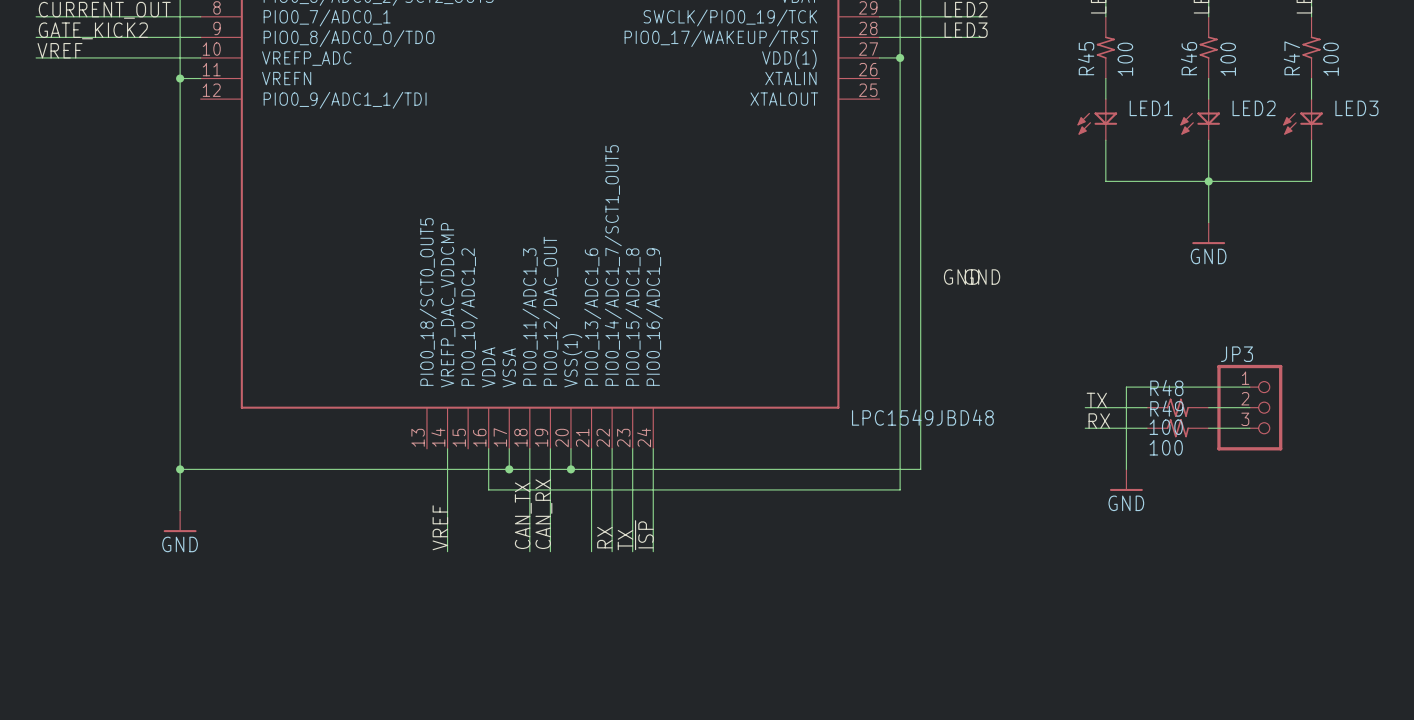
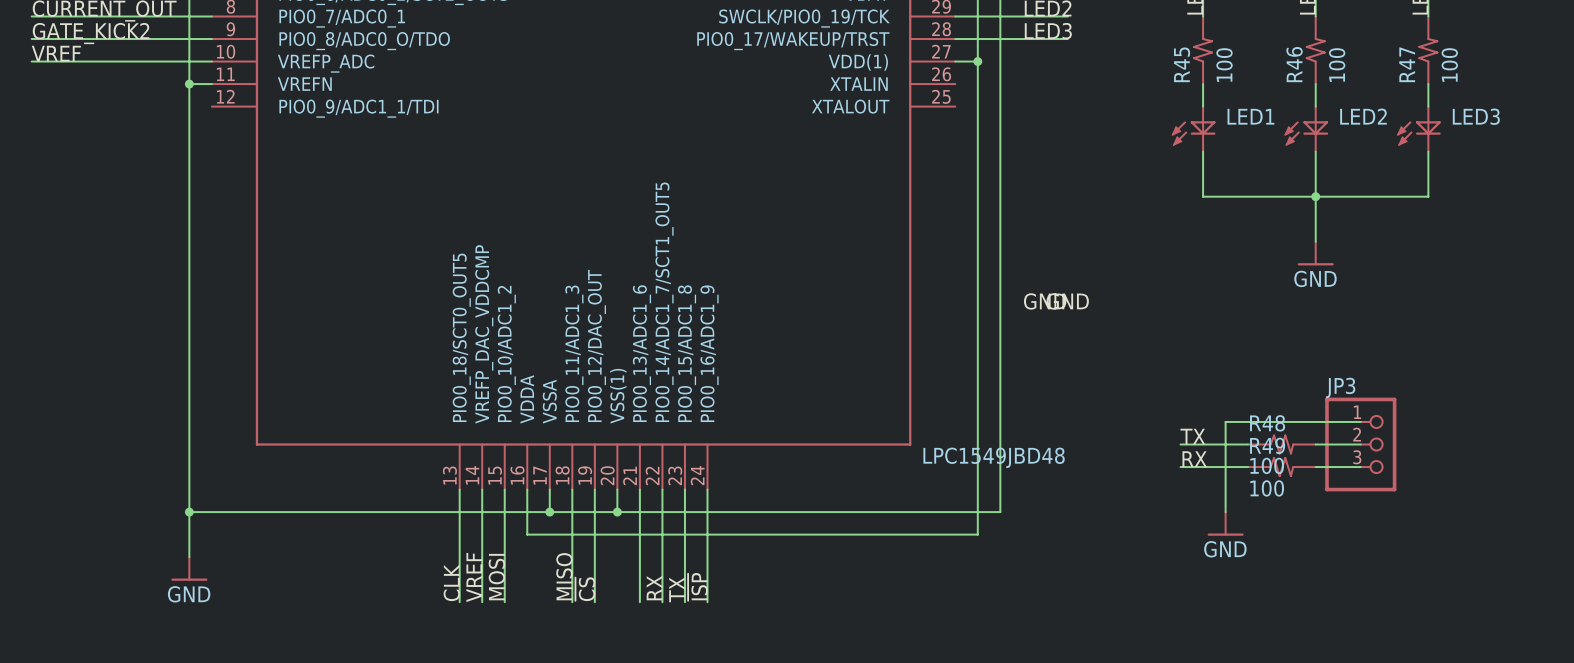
wire: none -> (459, 489) (459, 602)
wire: none -> (504, 489) (504, 602)
label: CAN_RX (543, 514) -> ~{CS} (585, 589)
label: CAN_TX (523, 515) -> MISO (564, 576)
label: none -> MOSI (496, 577)
label: none -> CLK (451, 582)

